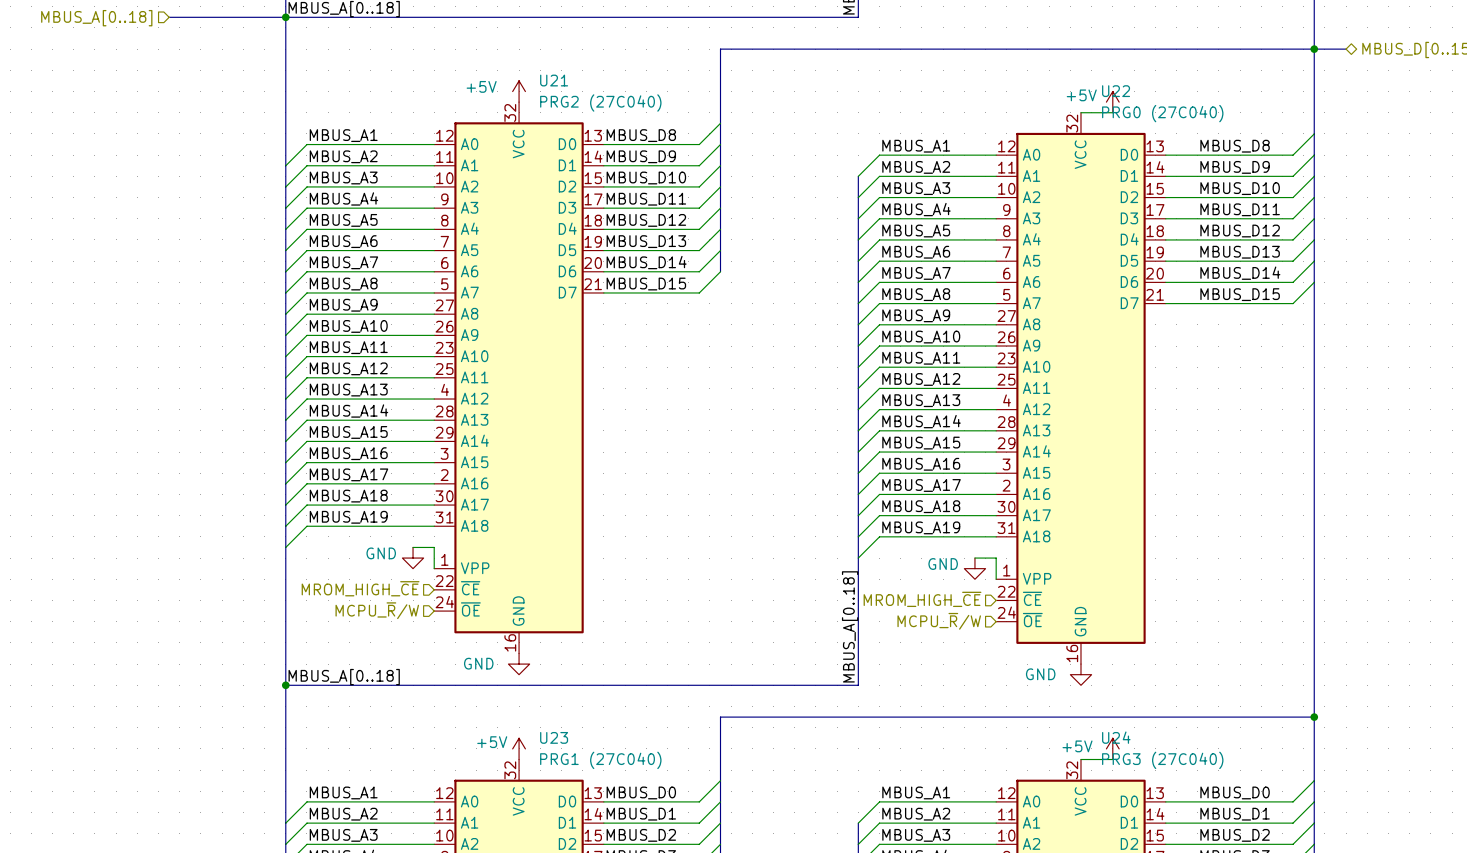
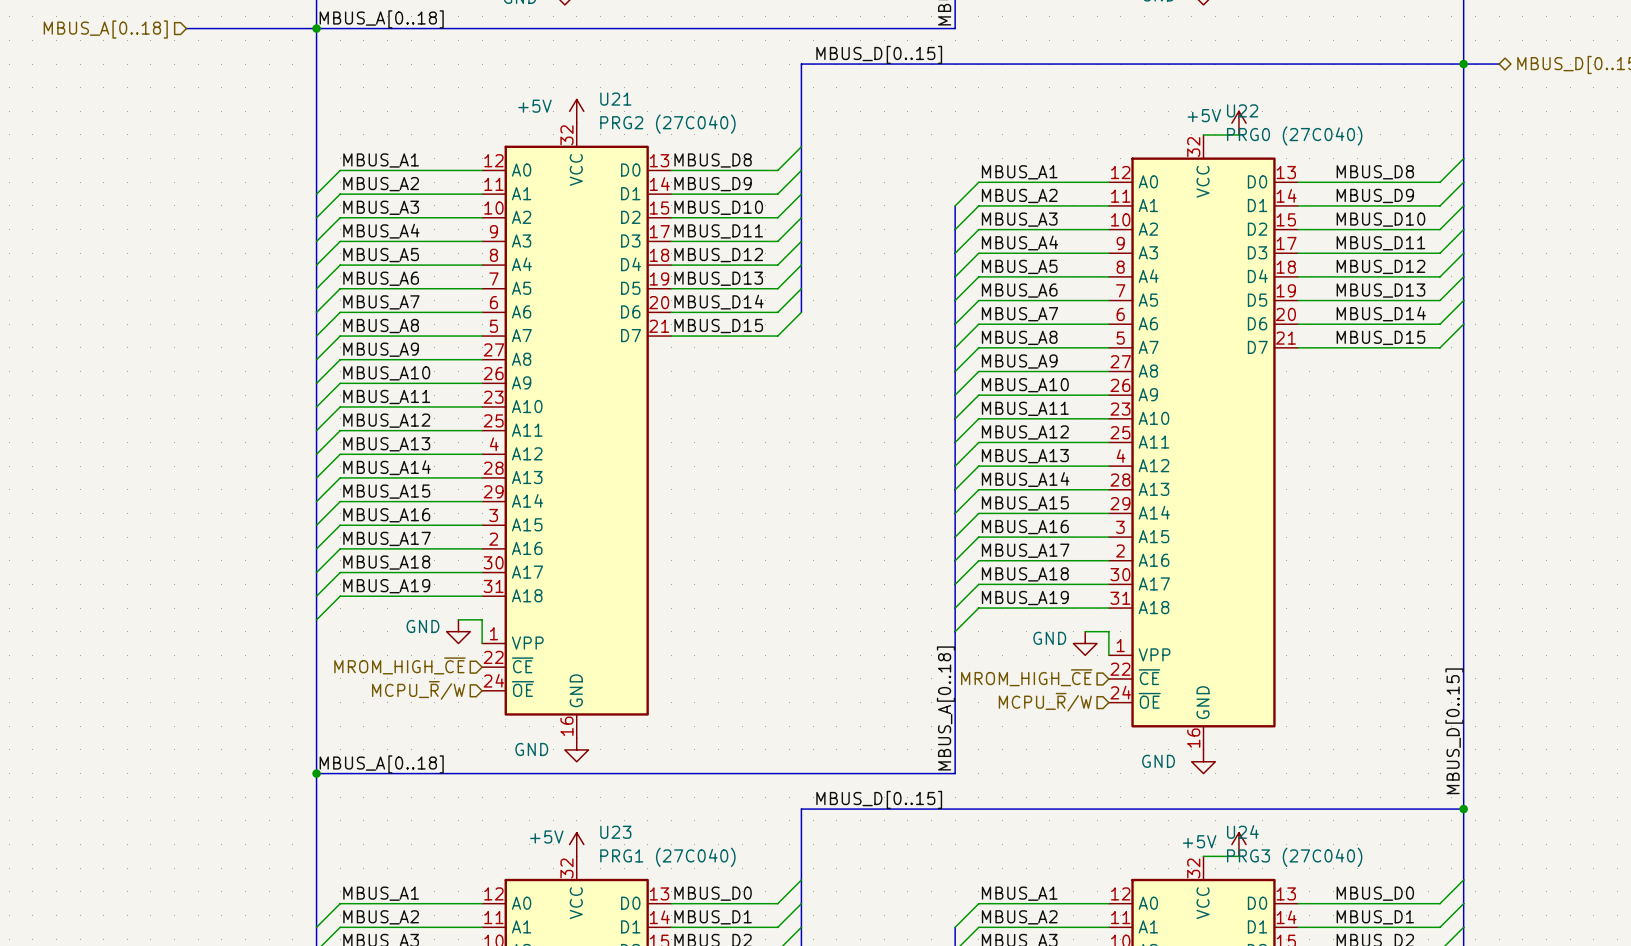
label: none -> MBUS_D[0..15] (879, 54)
label: none -> MBUS_D[0..15] (1454, 731)
label: none -> MBUS_D[0..15] (879, 799)

